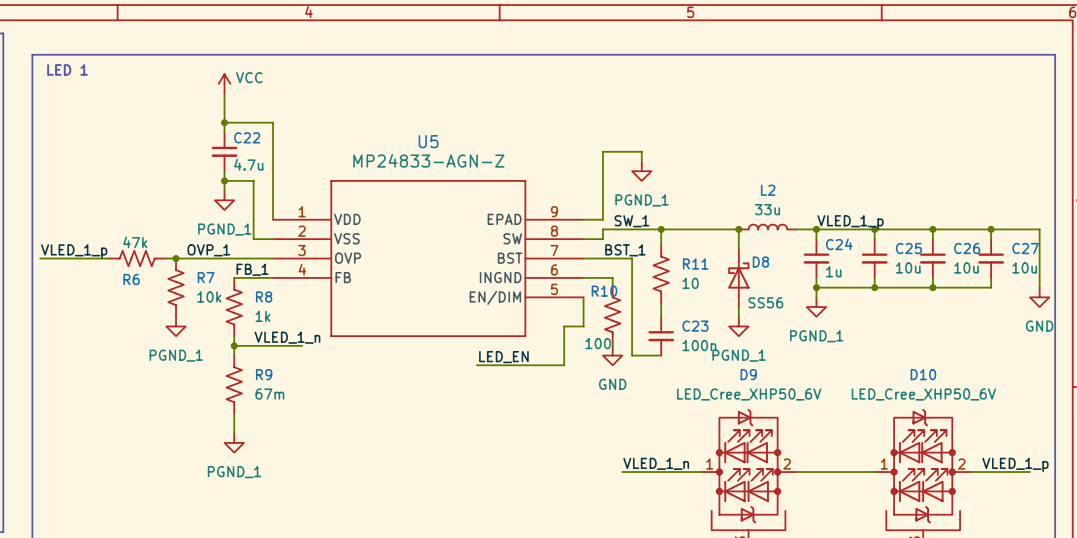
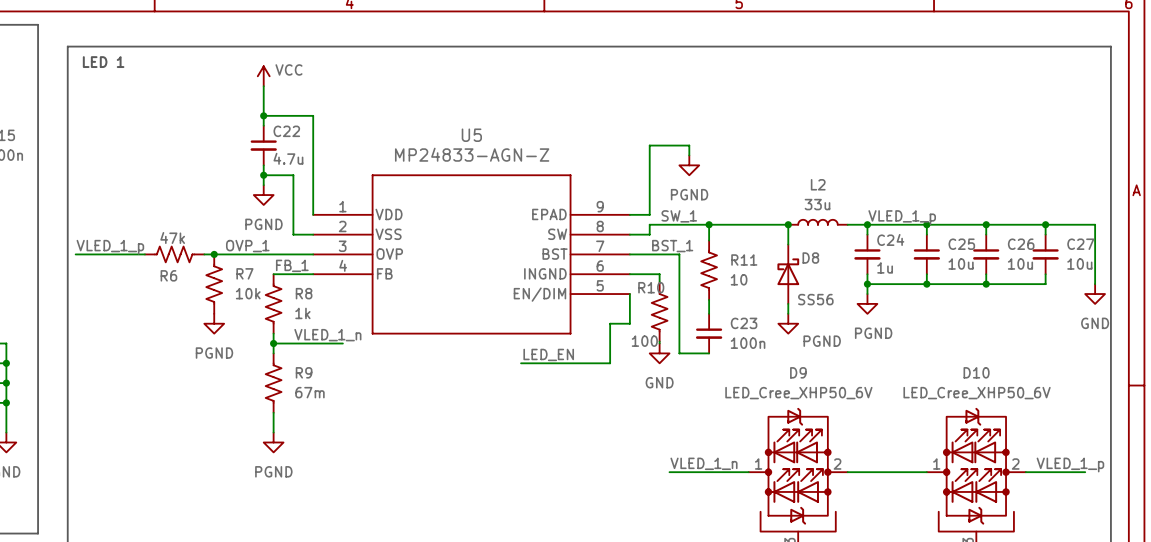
power symbol: PGND_1 (641, 171) -> PGND (689, 165)
power symbol: PGND_1 (224, 200) -> PGND (263, 195)
power symbol: PGND_1 (816, 307) -> PGND (867, 303)
power symbol: PGND_1 (176, 326) -> PGND (214, 323)
power symbol: PGND_1 (738, 326) -> PGND (788, 323)
power symbol: PGND_1 (234, 442) -> PGND (273, 442)

